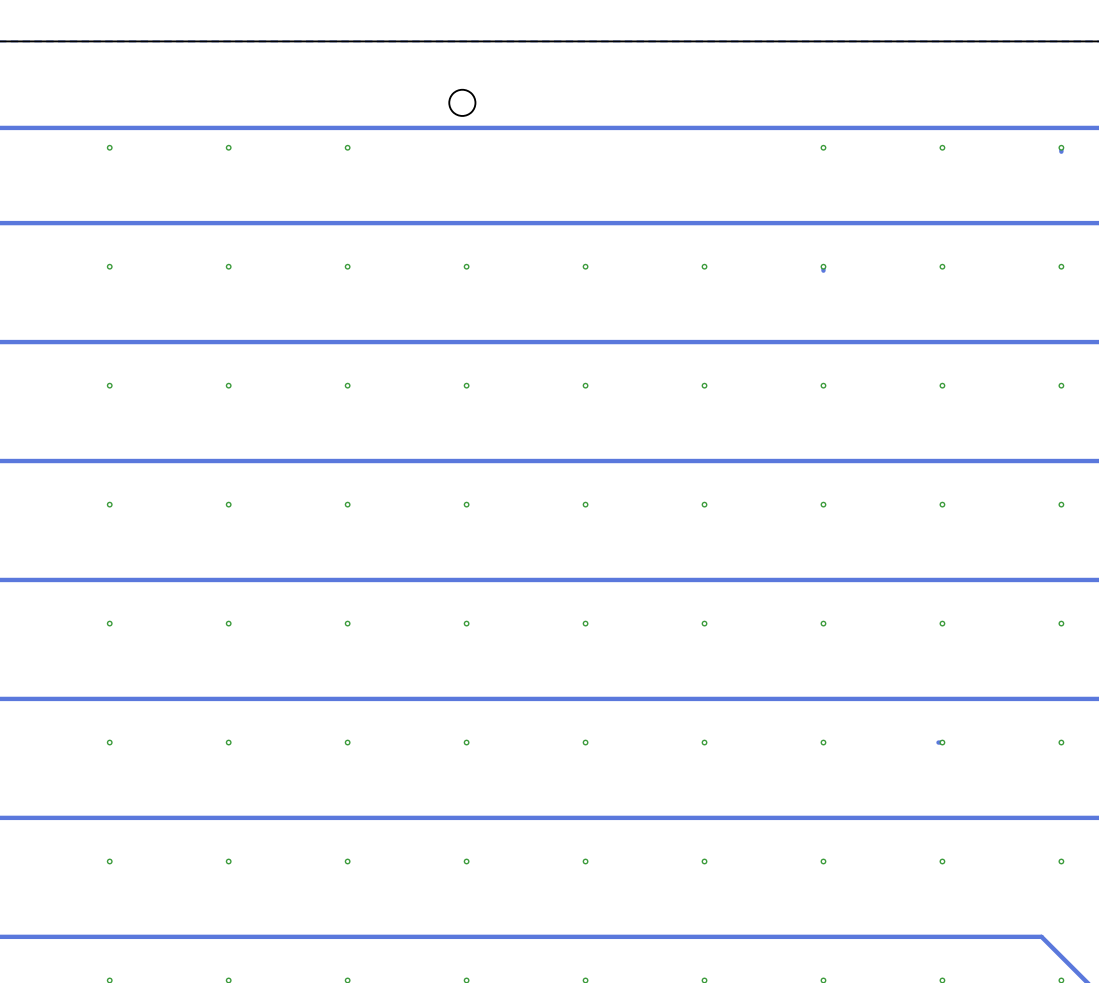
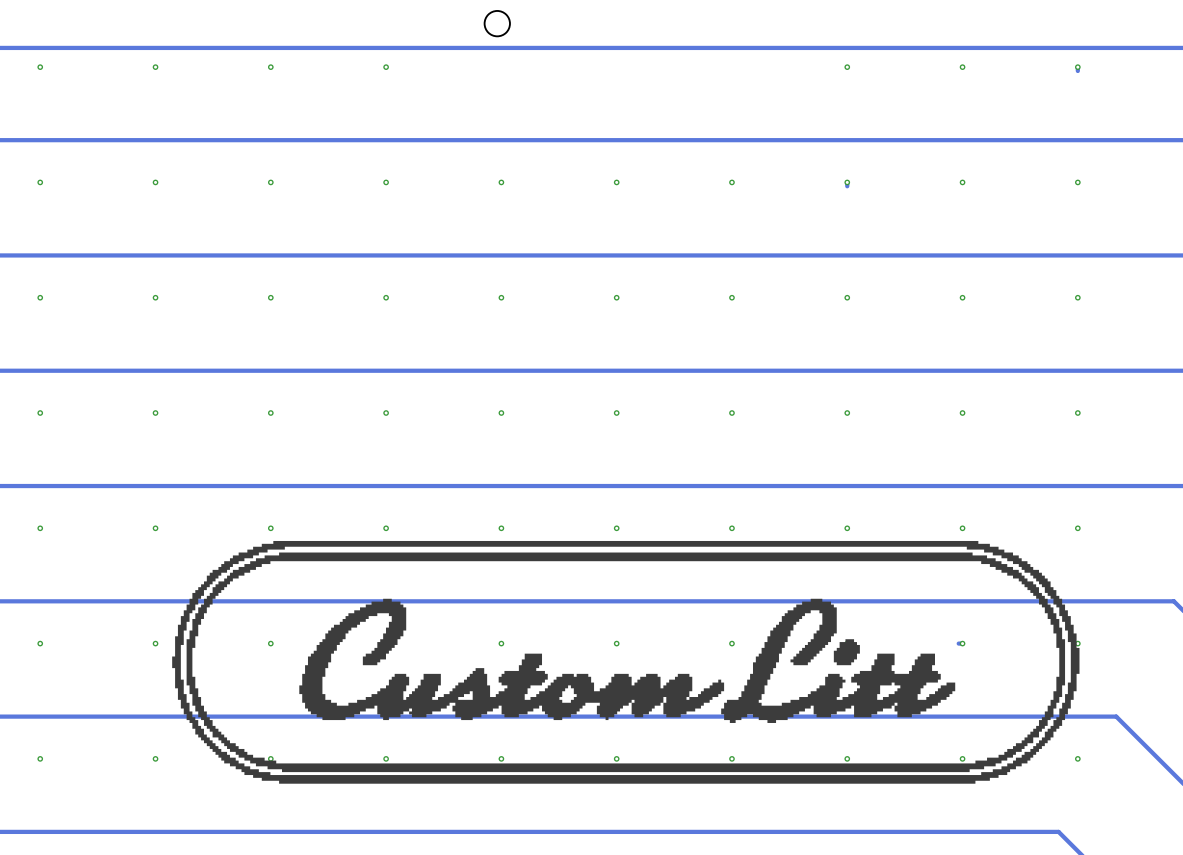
drawing: none -> [172, 540, 1080, 784]

